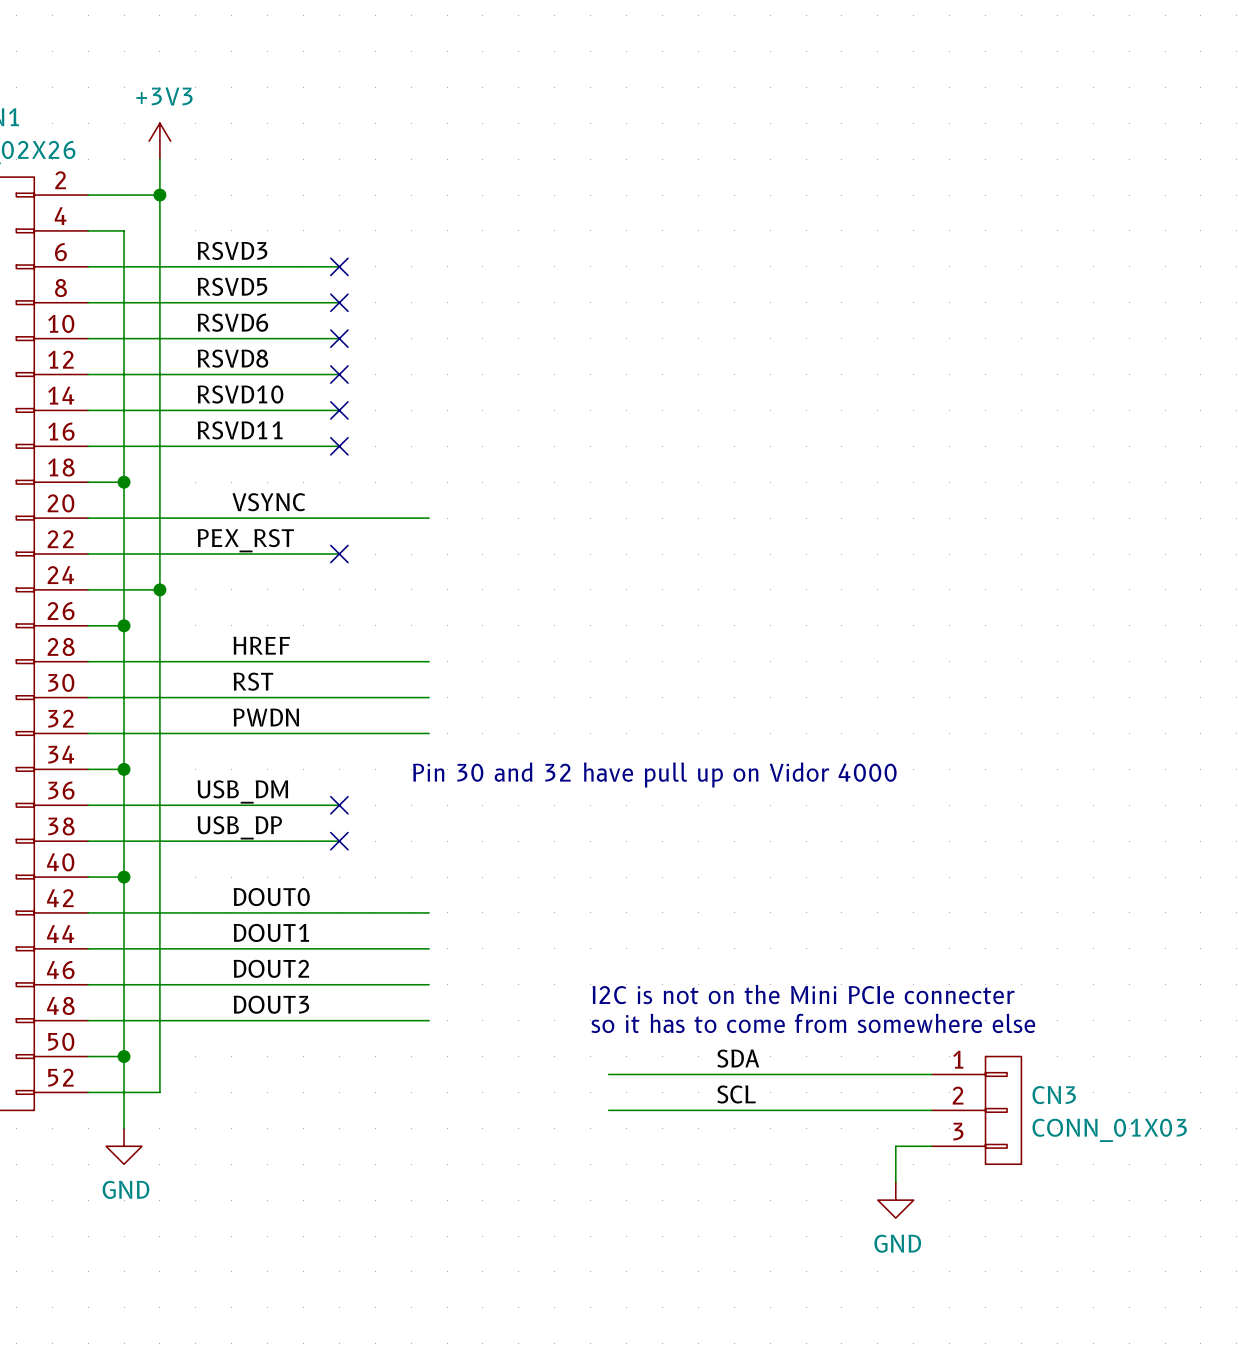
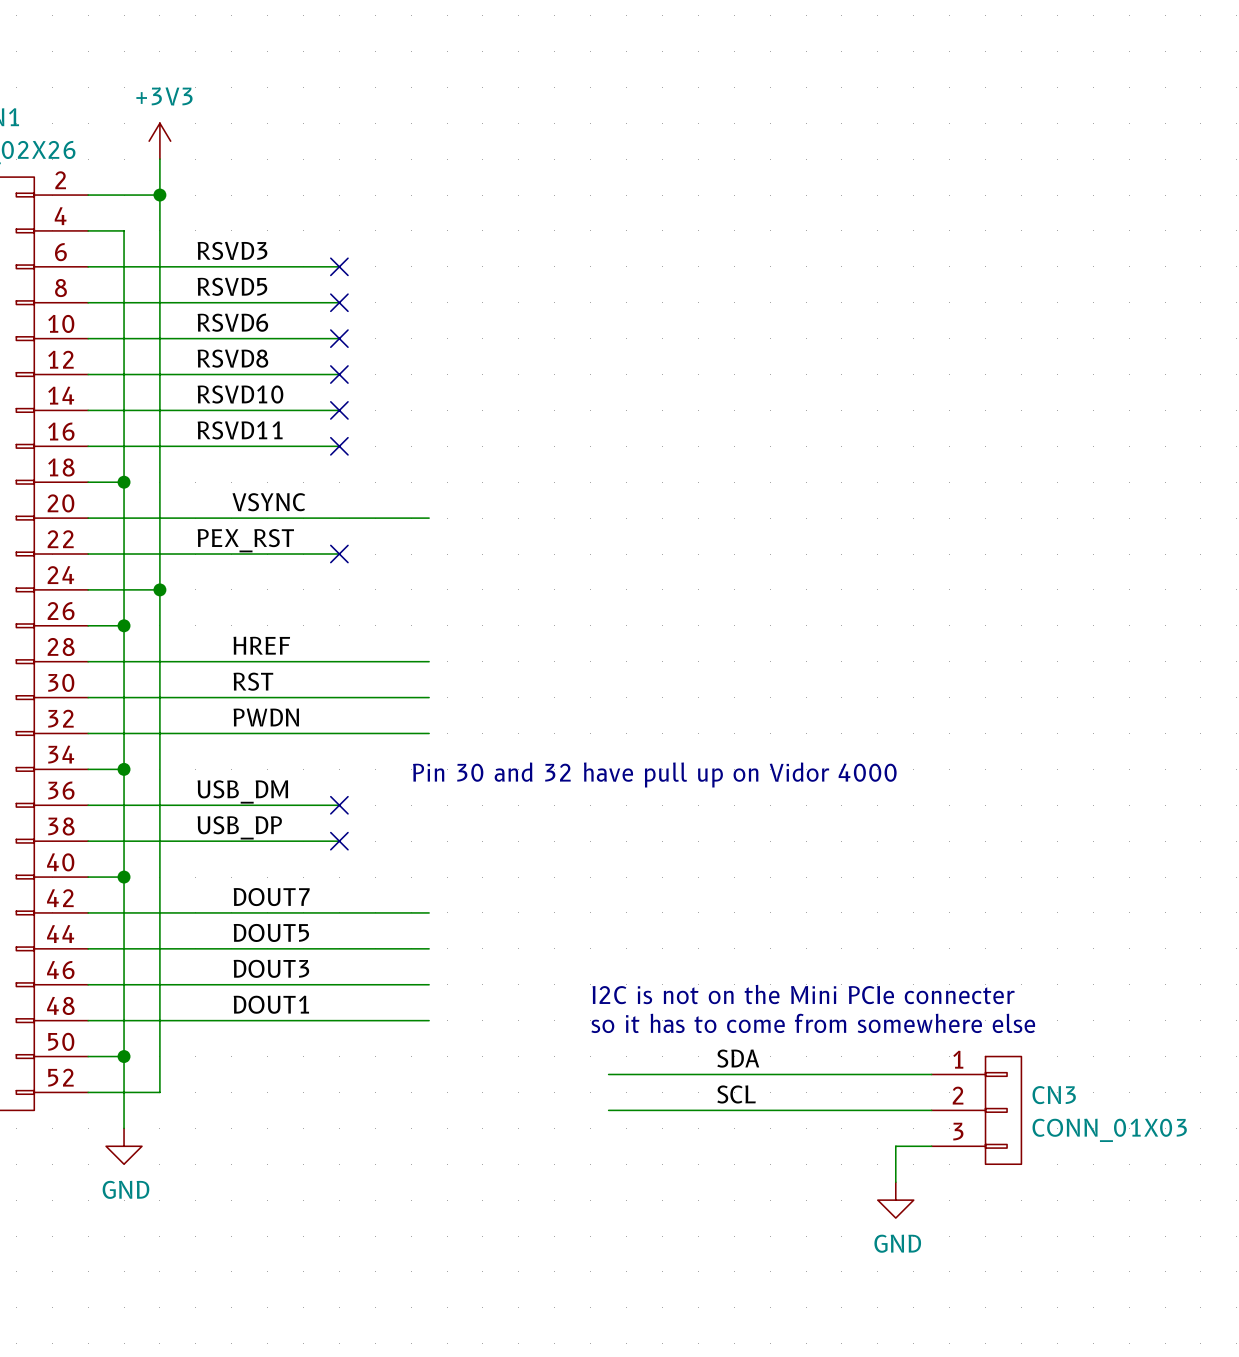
label: DOUT0 (271, 897) -> DOUT7 (271, 897)
label: DOUT1 (271, 932) -> DOUT5 (271, 932)
label: DOUT2 (271, 968) -> DOUT3 (271, 968)
label: DOUT3 (271, 1004) -> DOUT1 (271, 1004)

